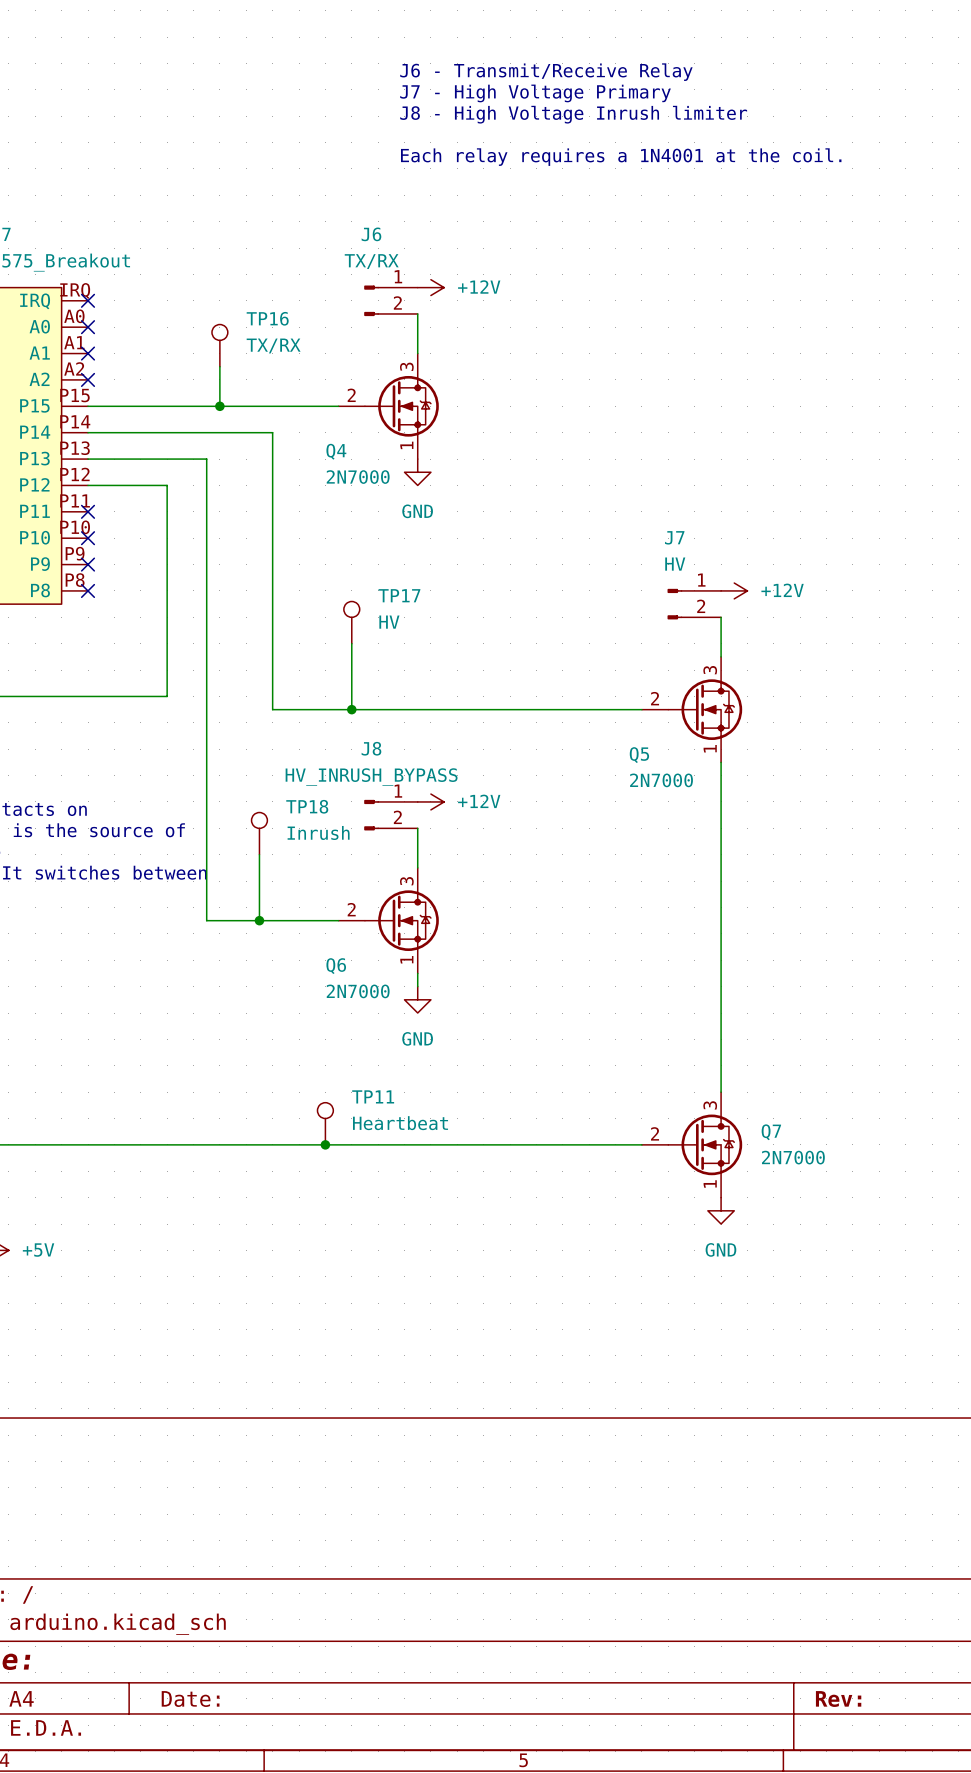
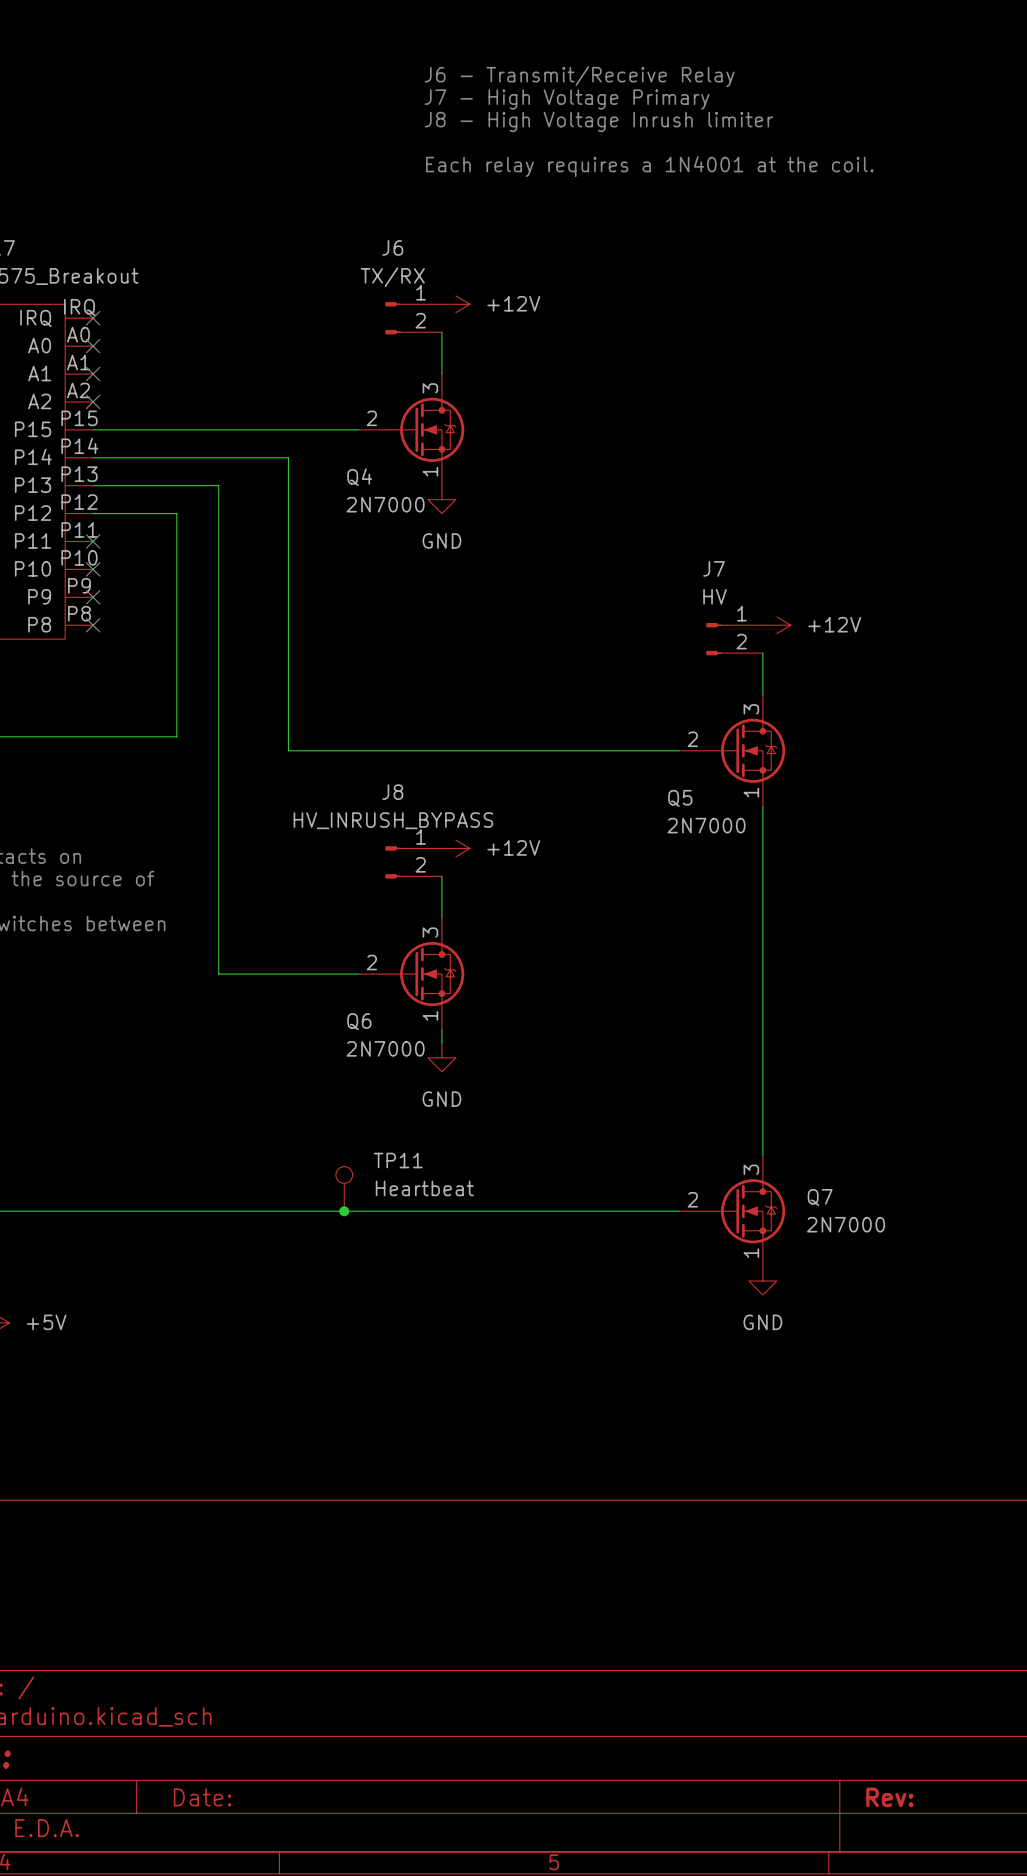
TP16: TX/RX (219, 345) -> none
wire: (219, 366) (219, 406) -> none
junction: (219, 406) -> none
TP17: HV (351, 622) -> none
wire: (351, 643) (351, 709) -> none
junction: (351, 709) -> none
TP18: Inrush (259, 833) -> none
wire: (259, 854) (259, 920) -> none
junction: (259, 920) -> none

